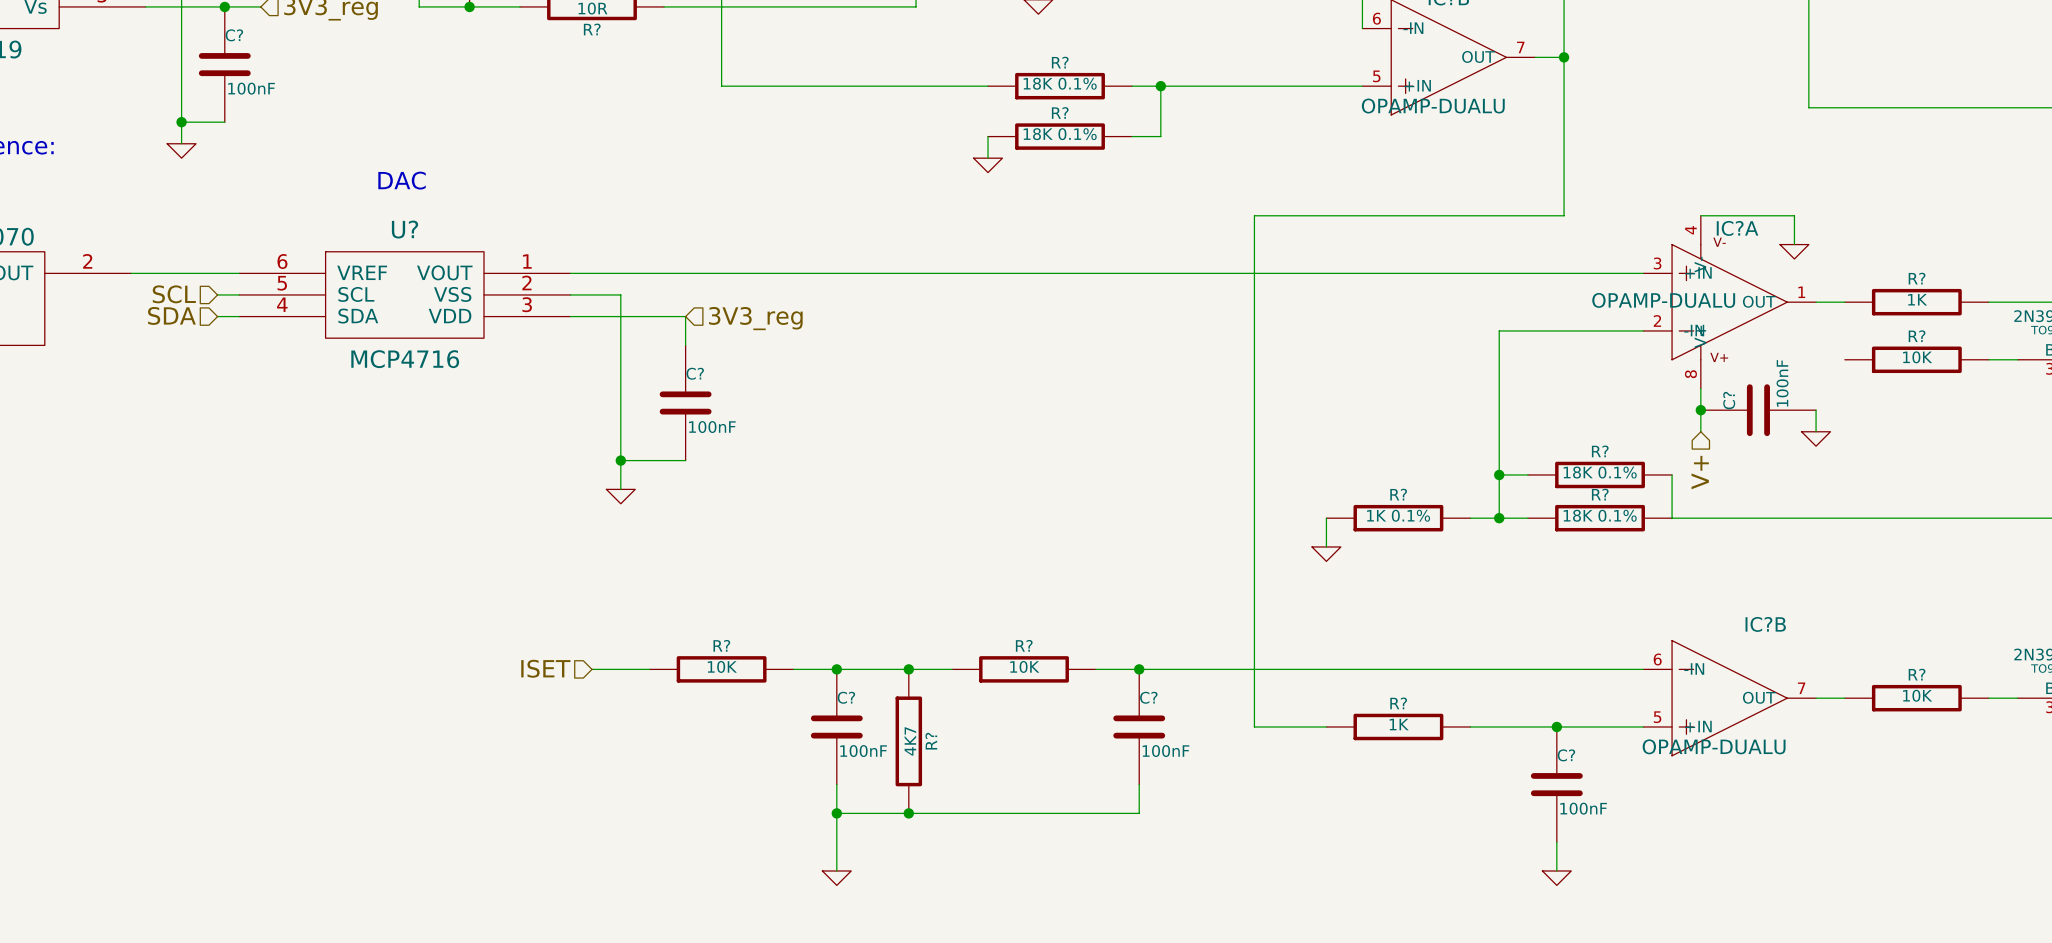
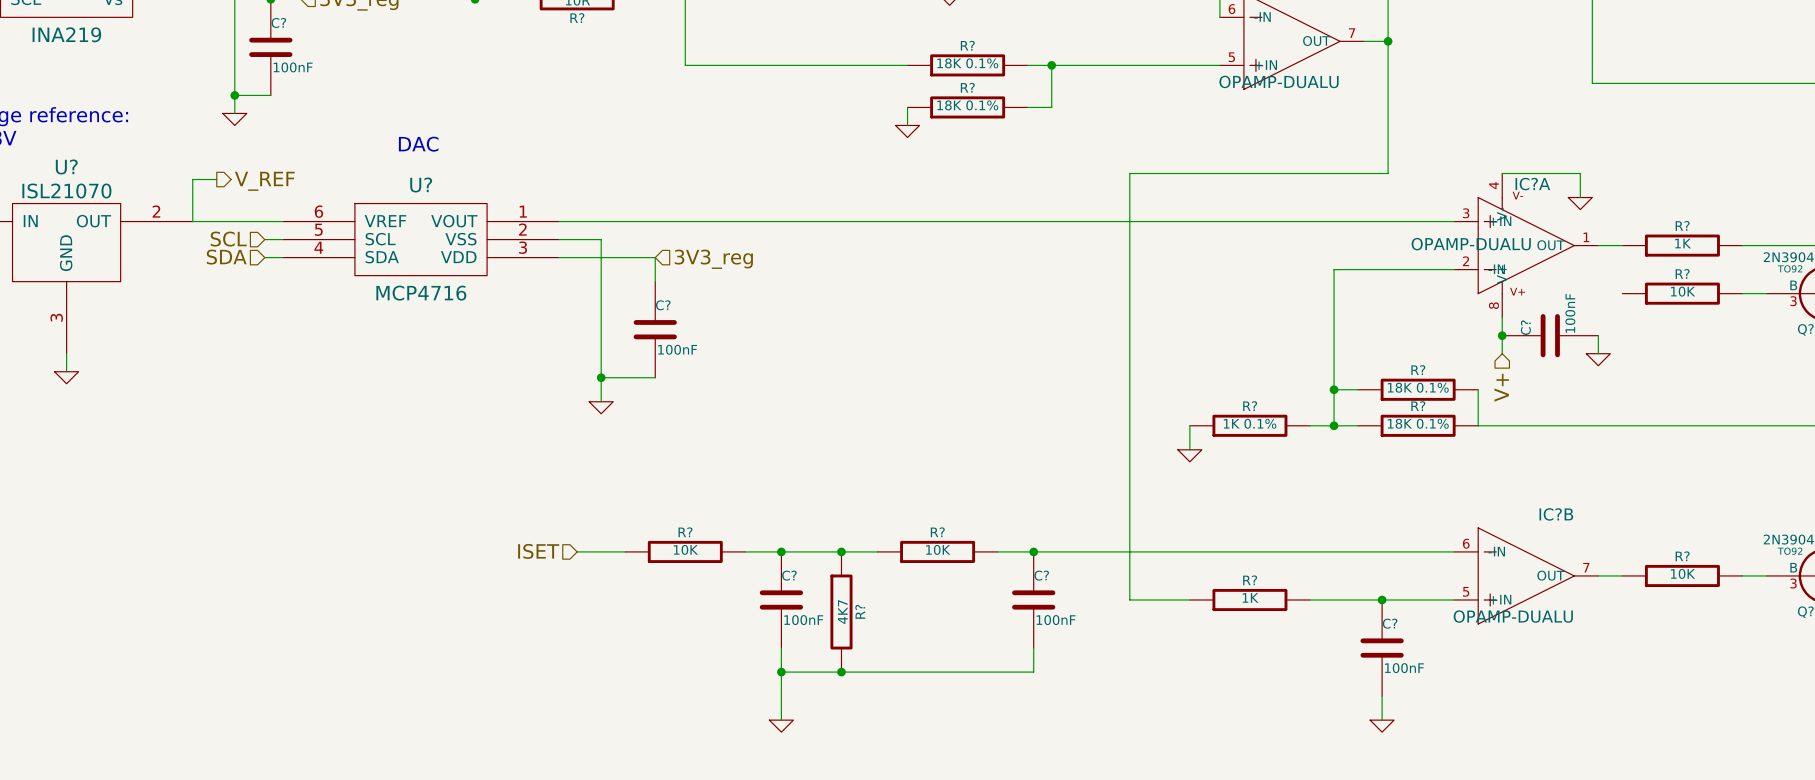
wire: none -> (216, 179) (192, 179) (192, 221)
hierarchical label: none -> V_REF (264, 181)

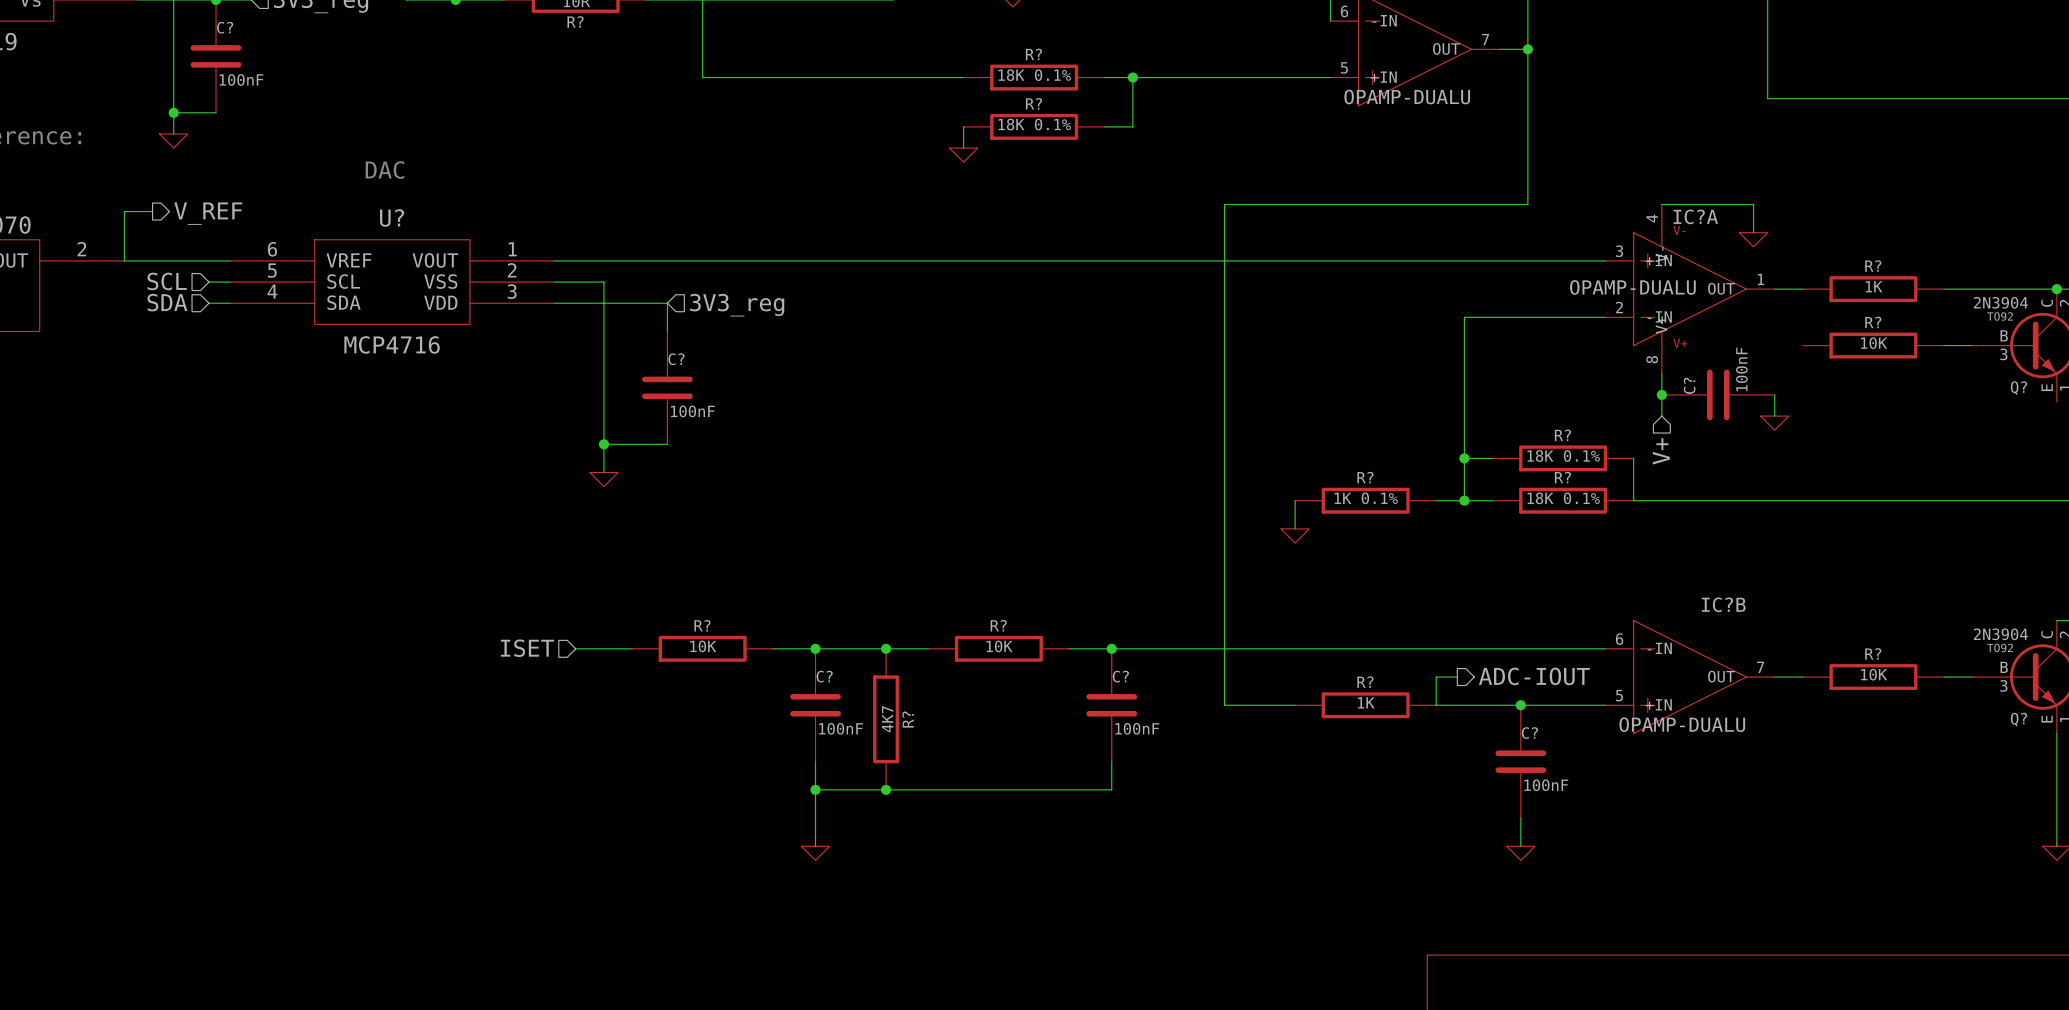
wire: none -> (1457, 677) (1436, 677) (1436, 705)
hierarchical label: none -> ADC-IOUT (1534, 676)

